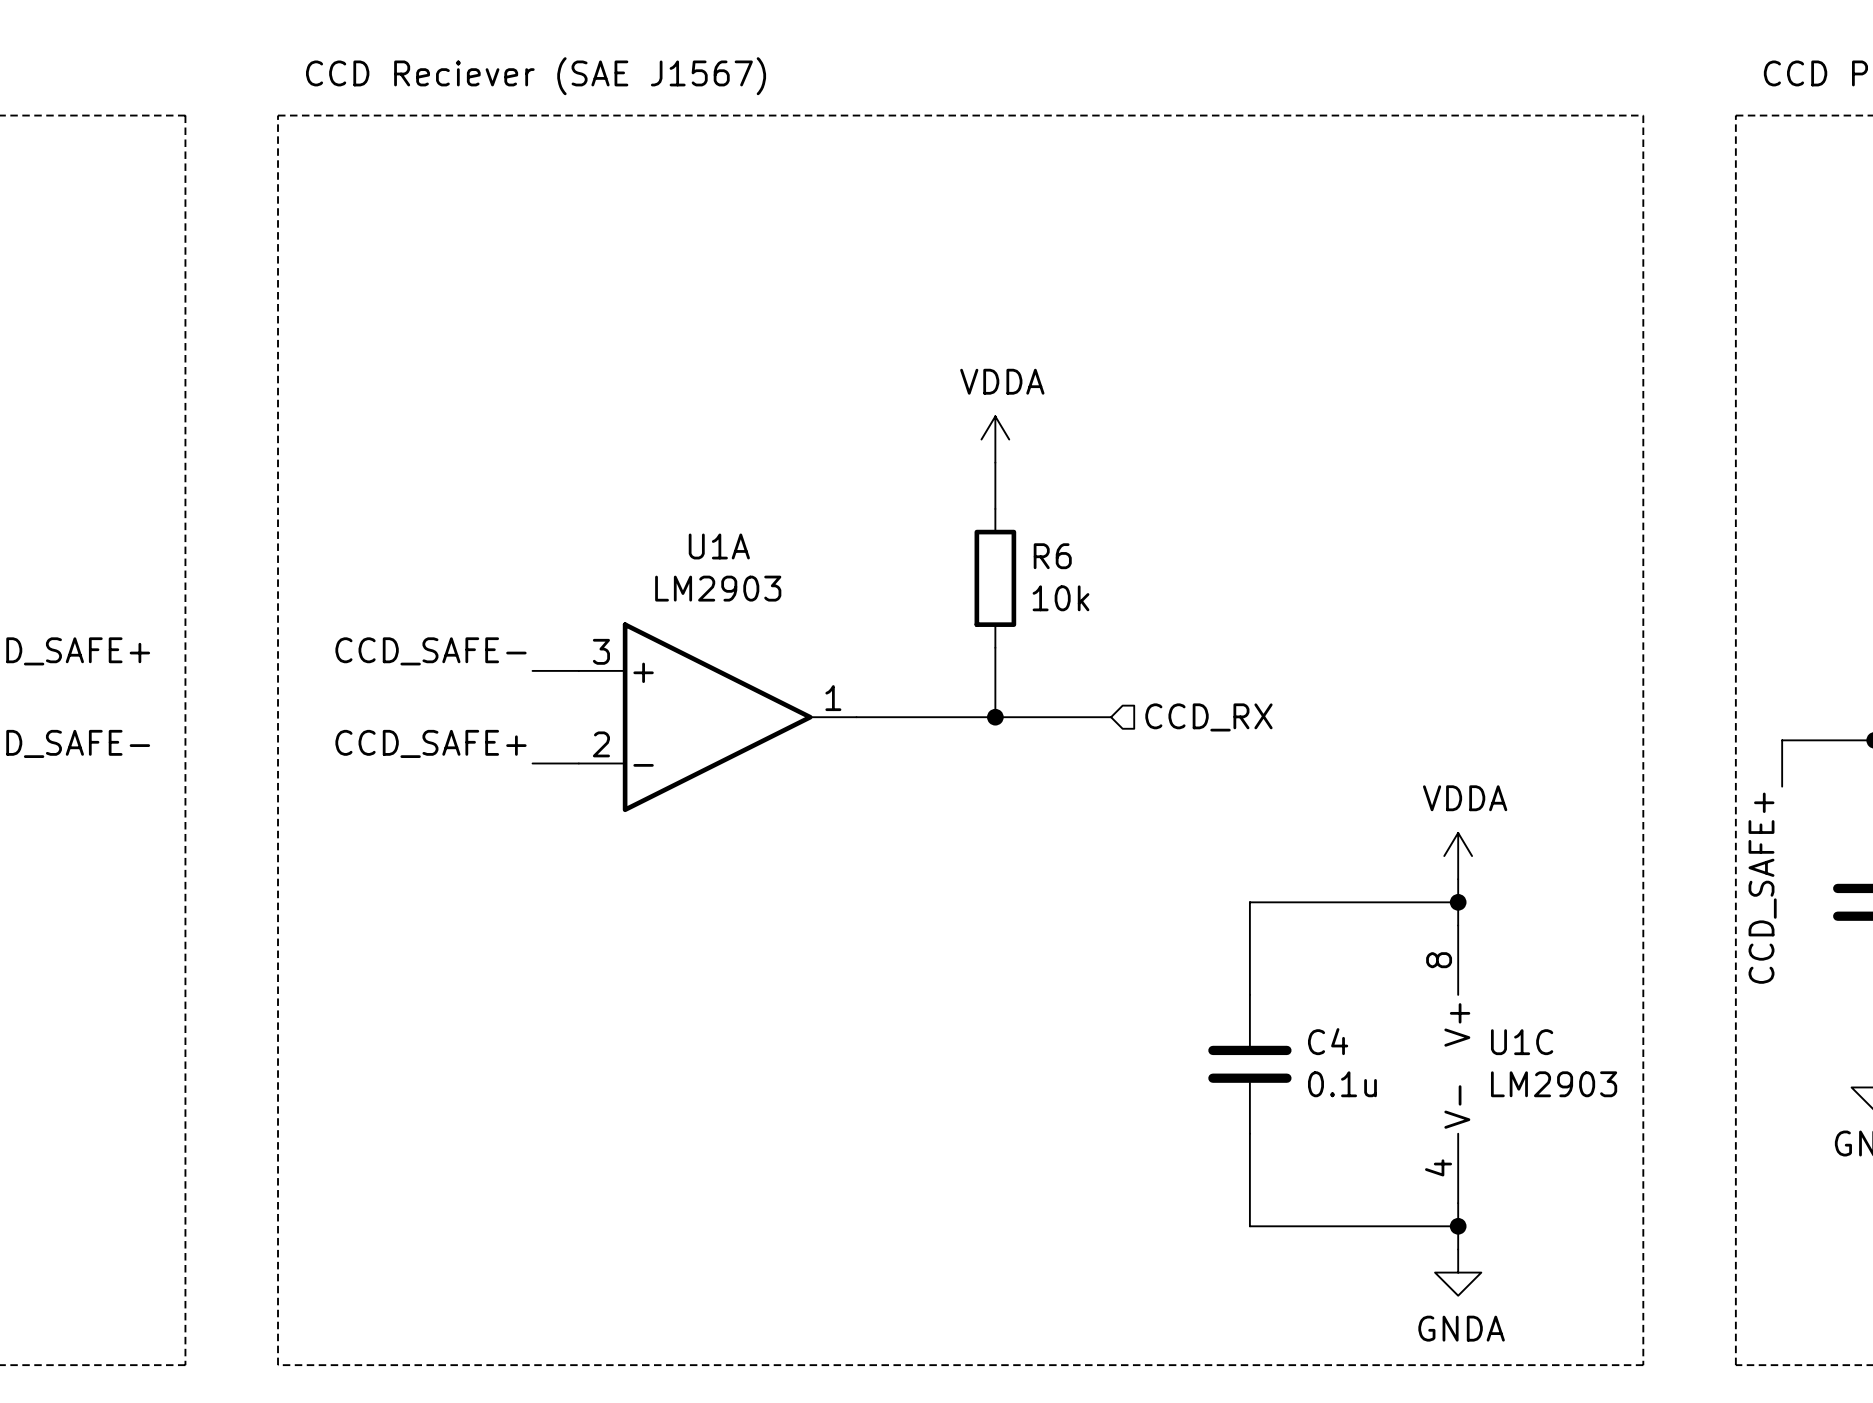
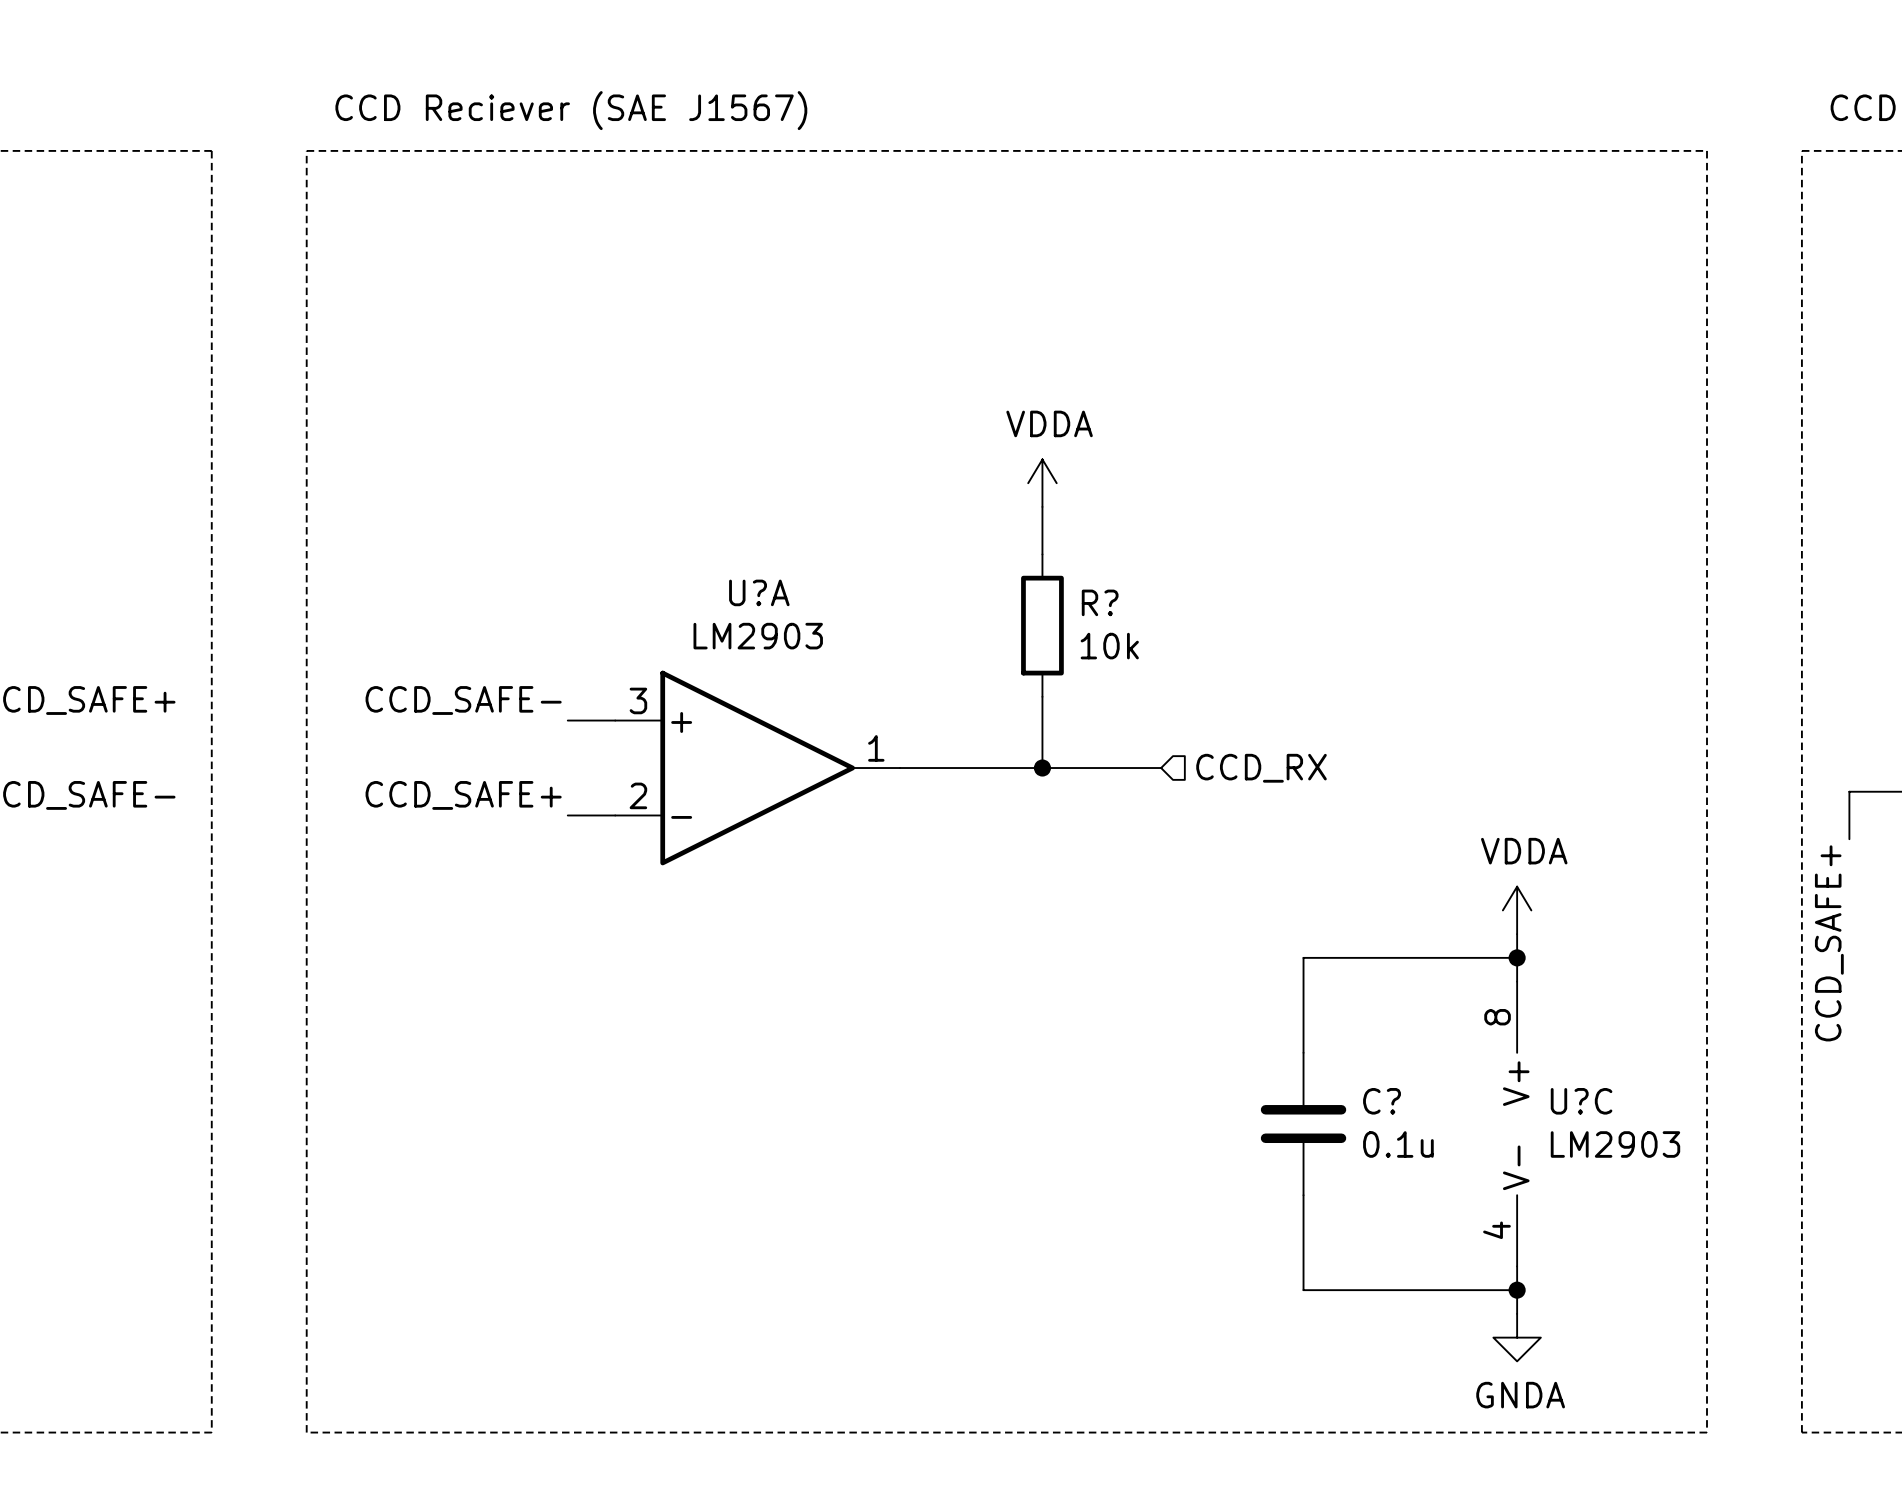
U1A name: U1A (719, 546) -> U?A (759, 592)
R6 name: R6 (1052, 556) -> R? (1100, 602)
C4 name: C4 (1328, 1041) -> C? (1382, 1101)
U1C name: U1C (1522, 1042) -> U?C (1581, 1101)

